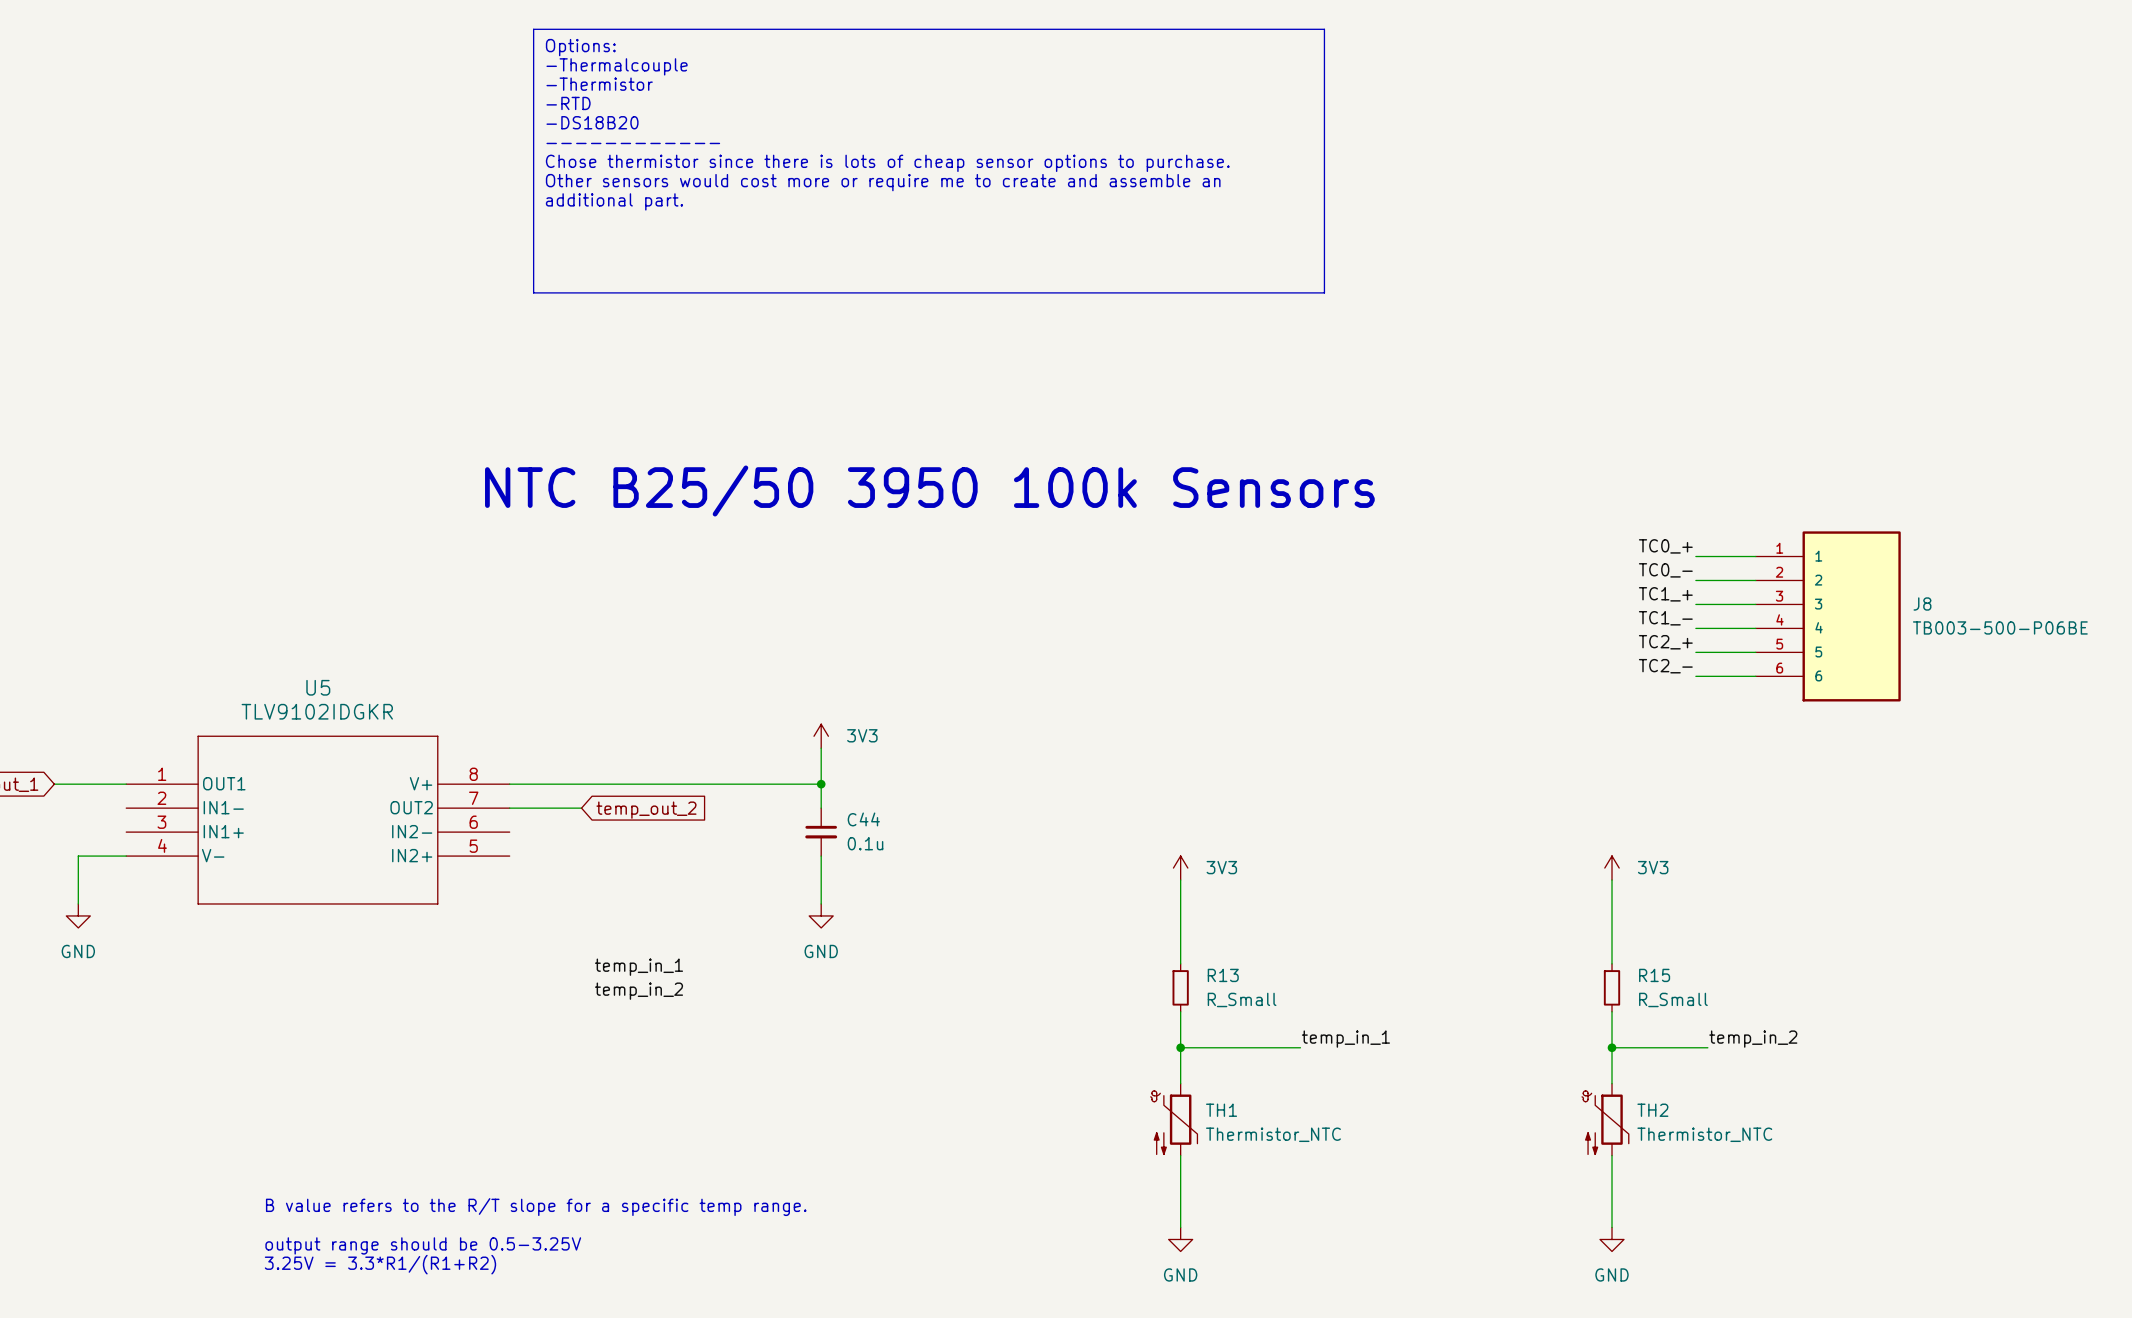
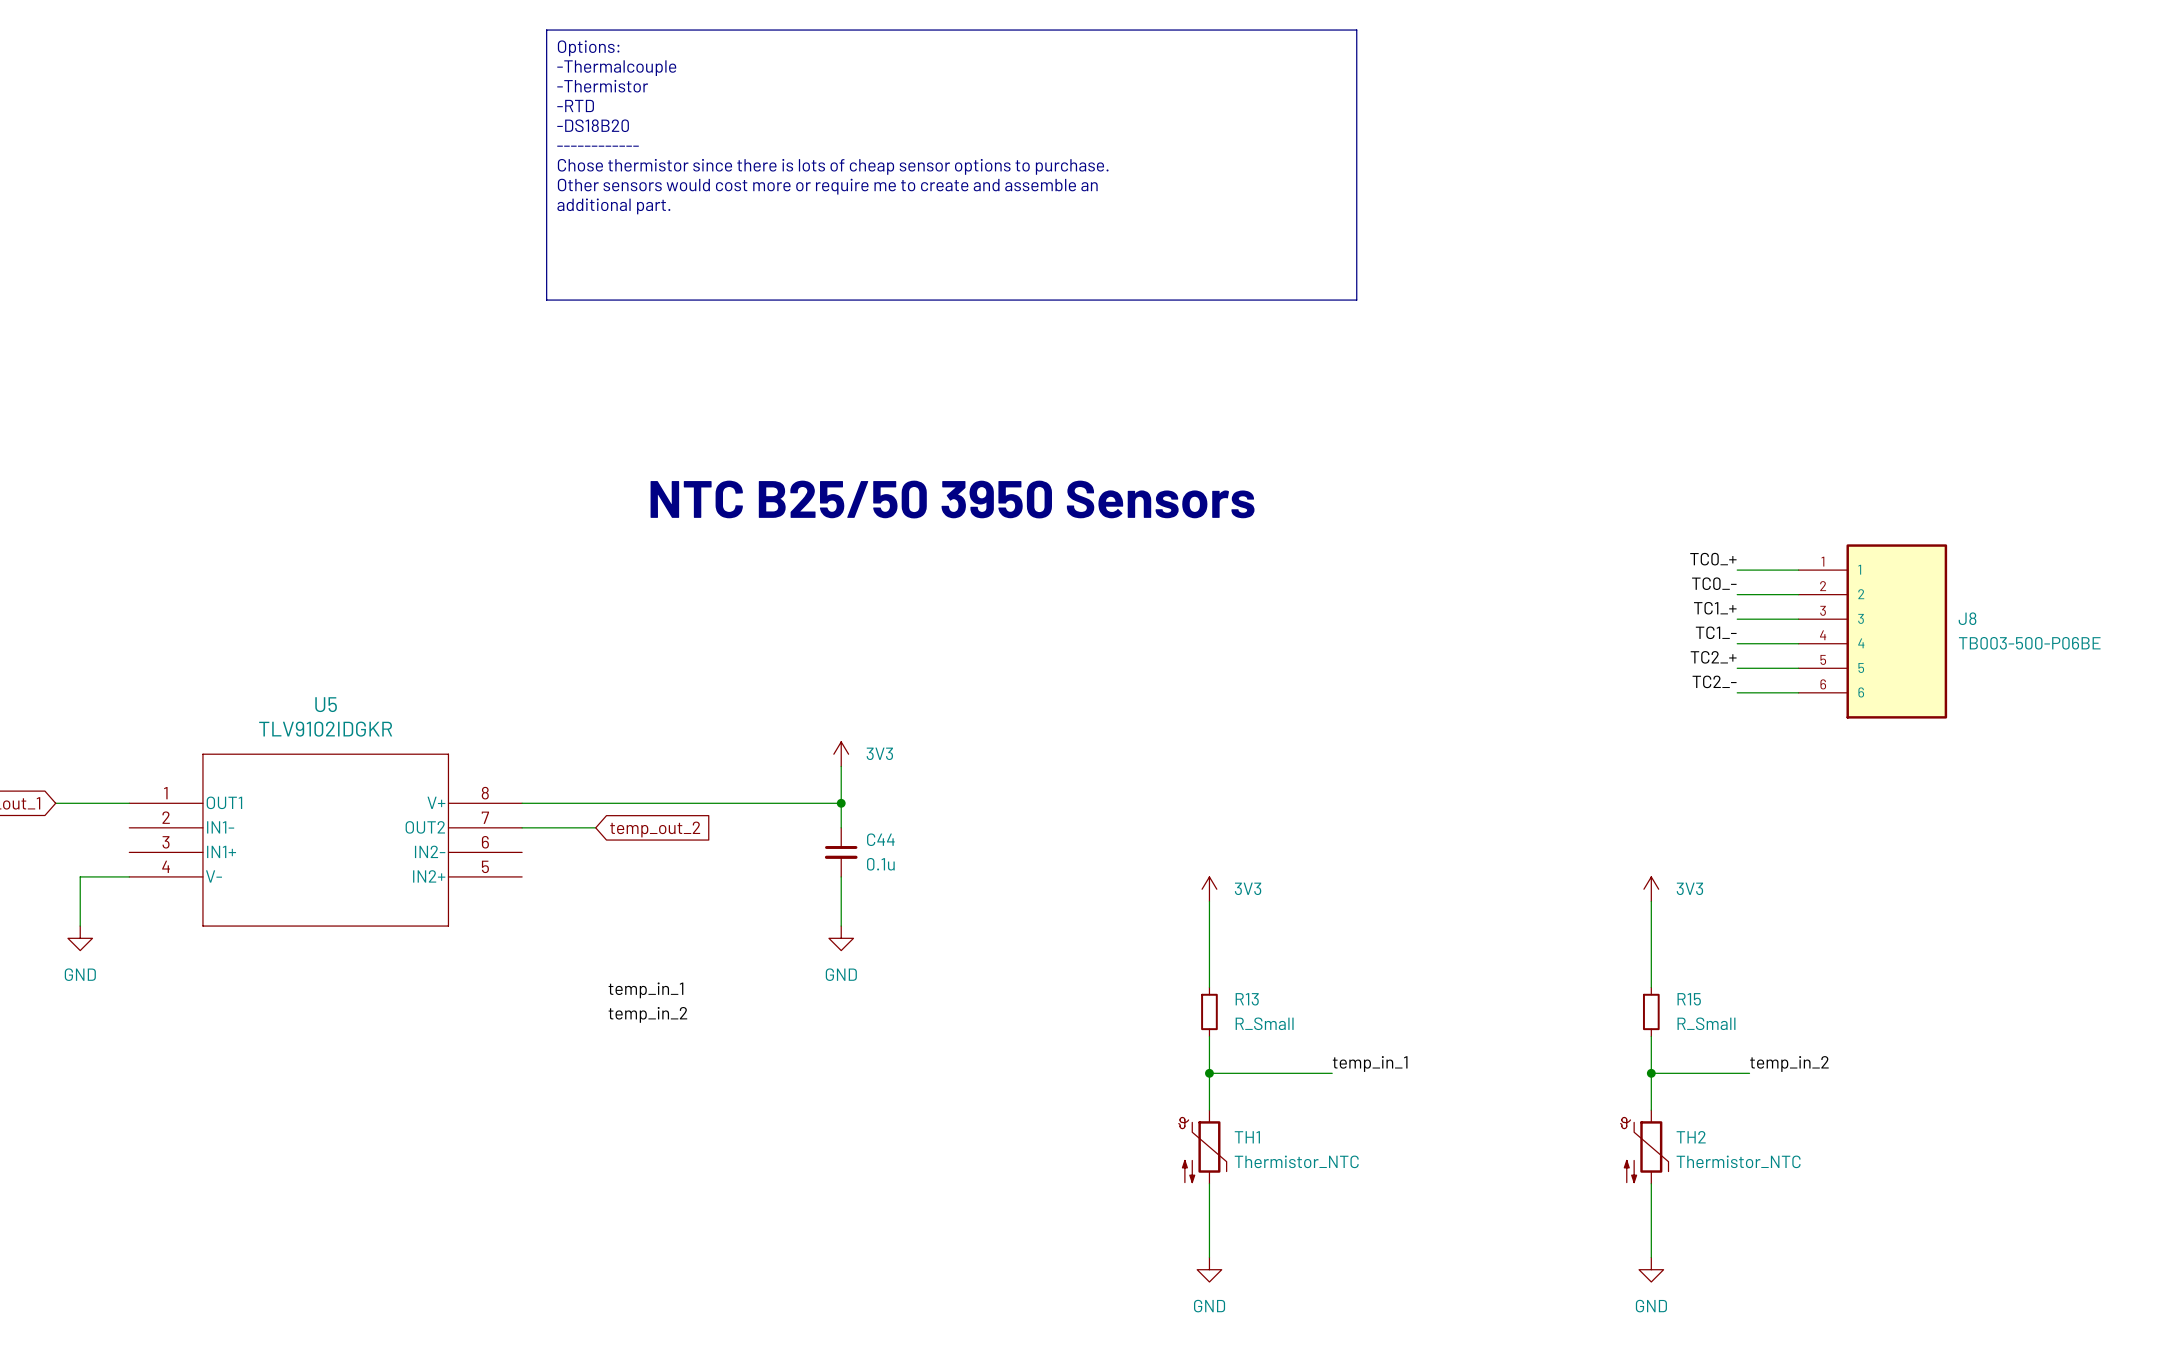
text: NTC B25/50 3950 100k Sensors (929, 490) -> NTC B25/50 3950 Sensors (952, 499)
text: B value refers to the R/T slope for a specific temp range. (536, 1207) -> none
text: output range should be 0.5-3.25V (423, 1245) -> none
text: 3.25V = 3.3*R1/(R1+R2) (380, 1264) -> none

